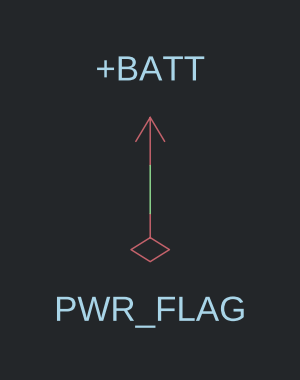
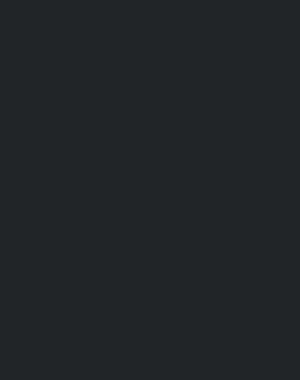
power symbol: +BATT (150, 141) -> none
wire: (150, 165) (150, 213) -> none
power symbol: PWR_FLAG (150, 237) -> none

